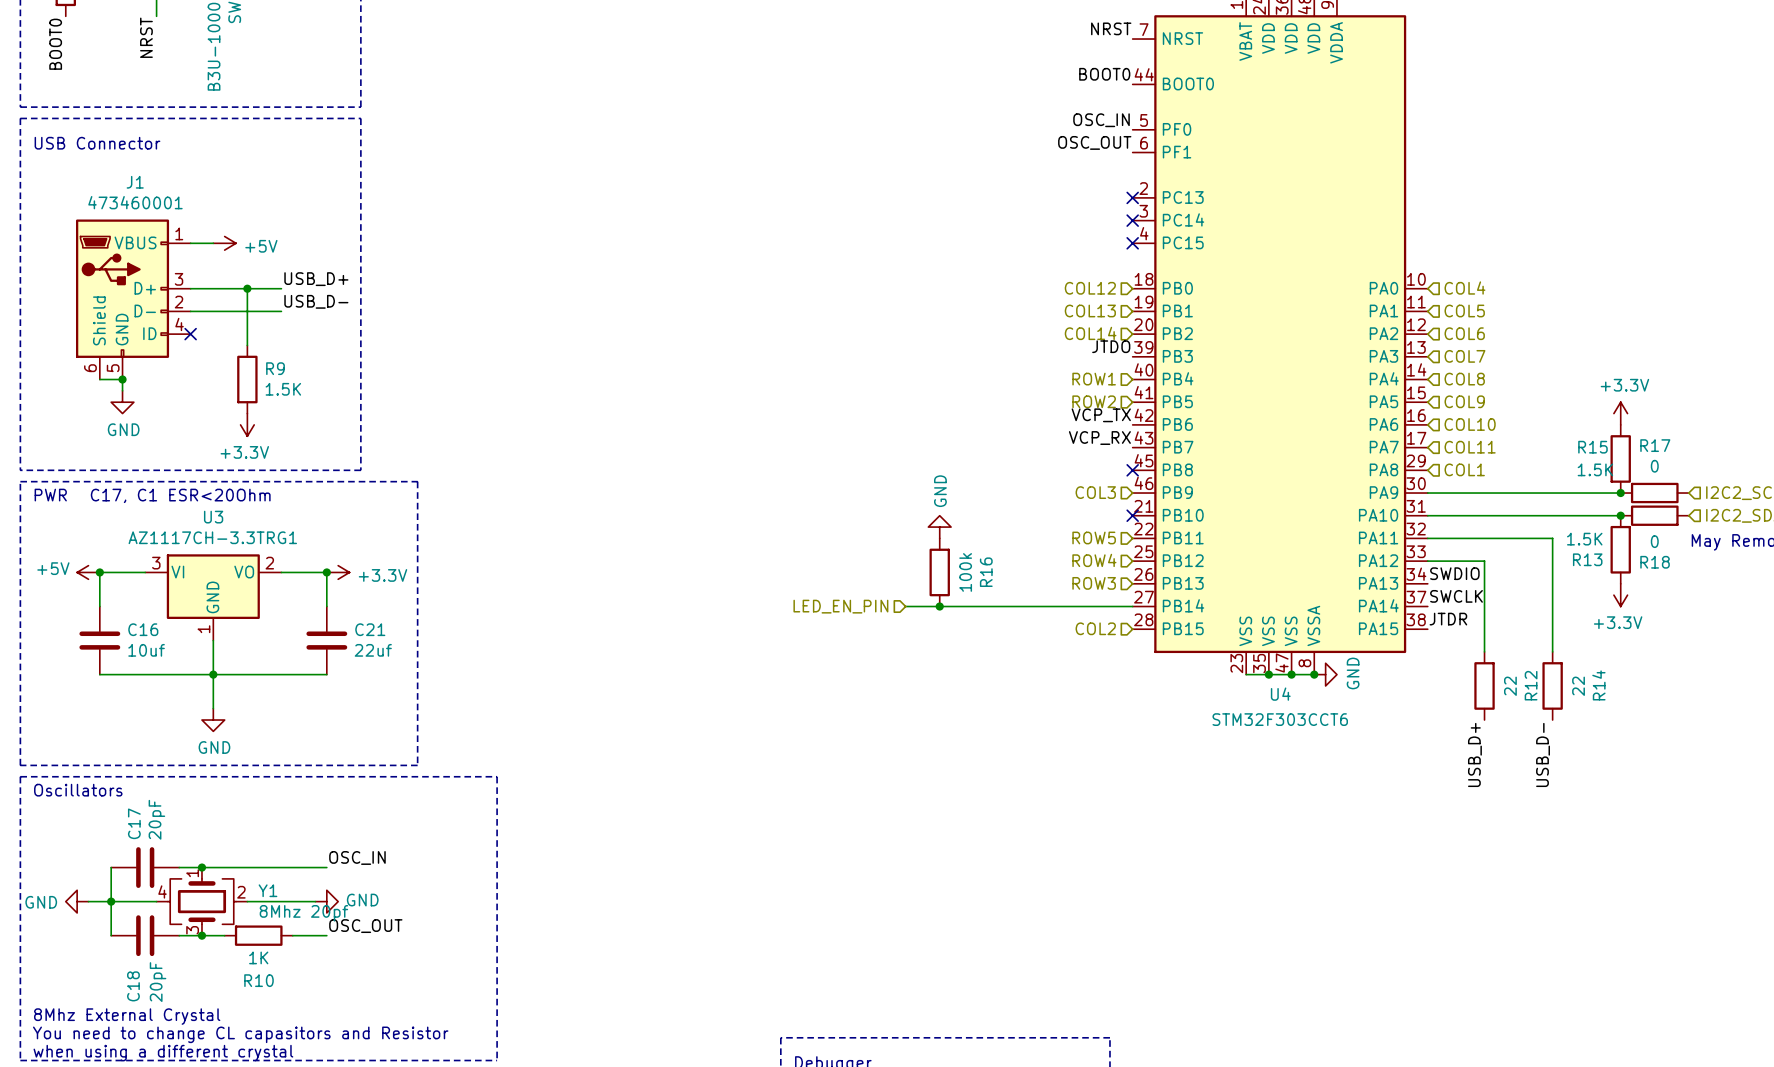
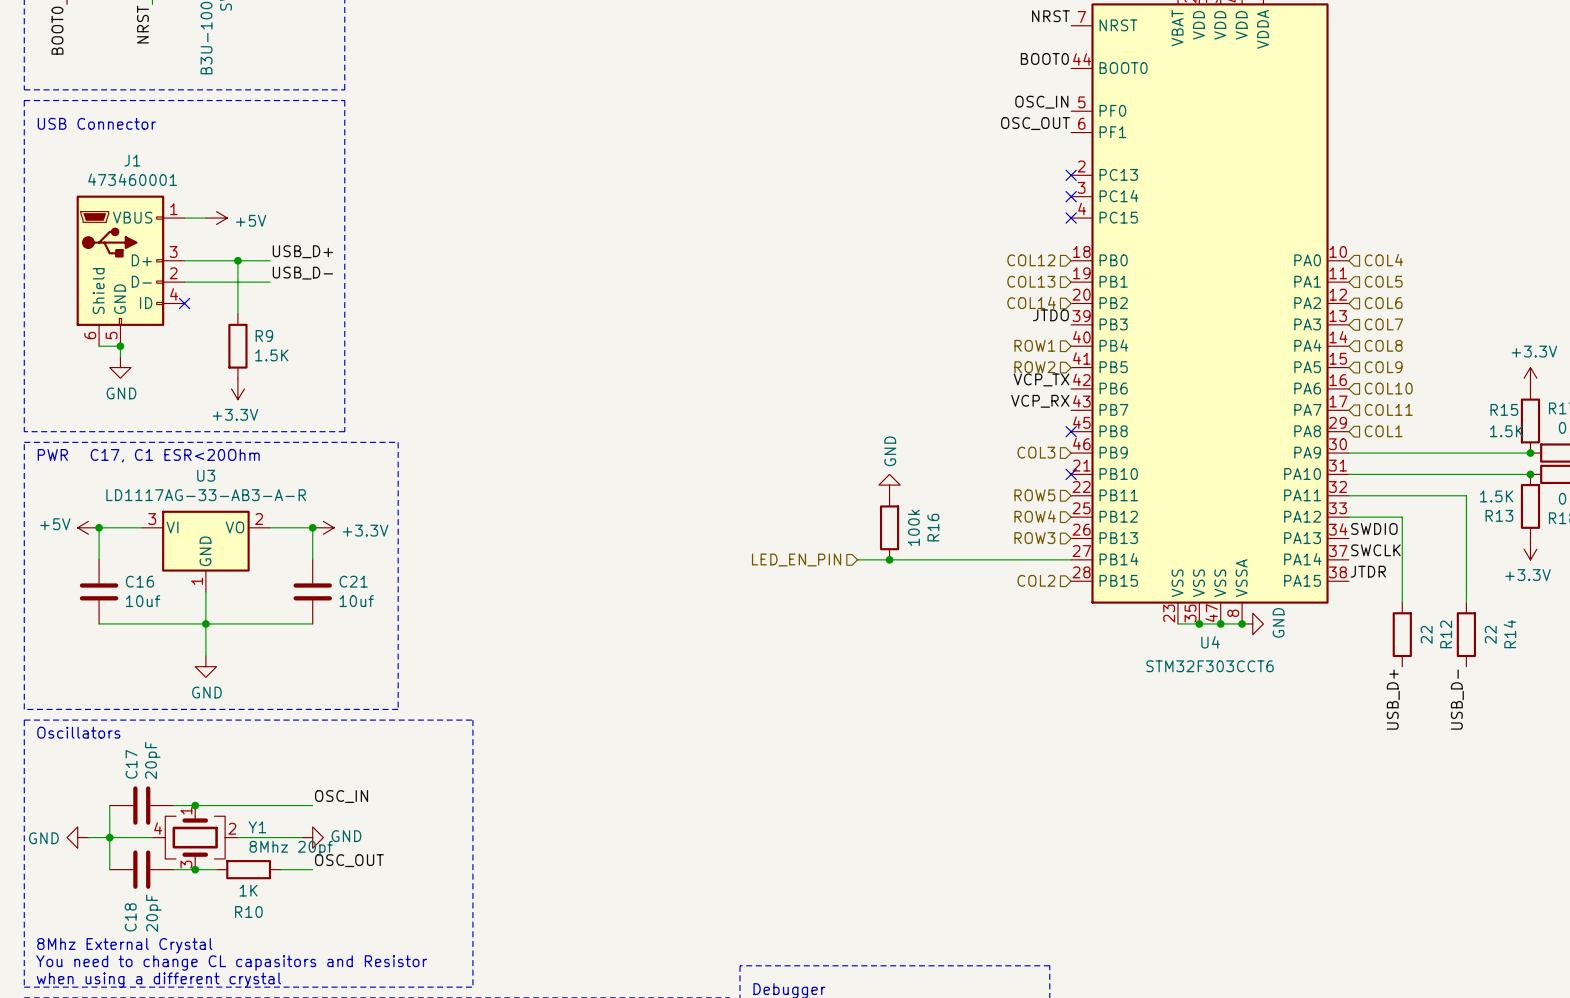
U3 value: AZ1117CH-3.3TRG1 (212, 537) -> LD1117AG-33-AB3-A-R (206, 495)
C21 value: 22uf (373, 650) -> 10uf (356, 601)

